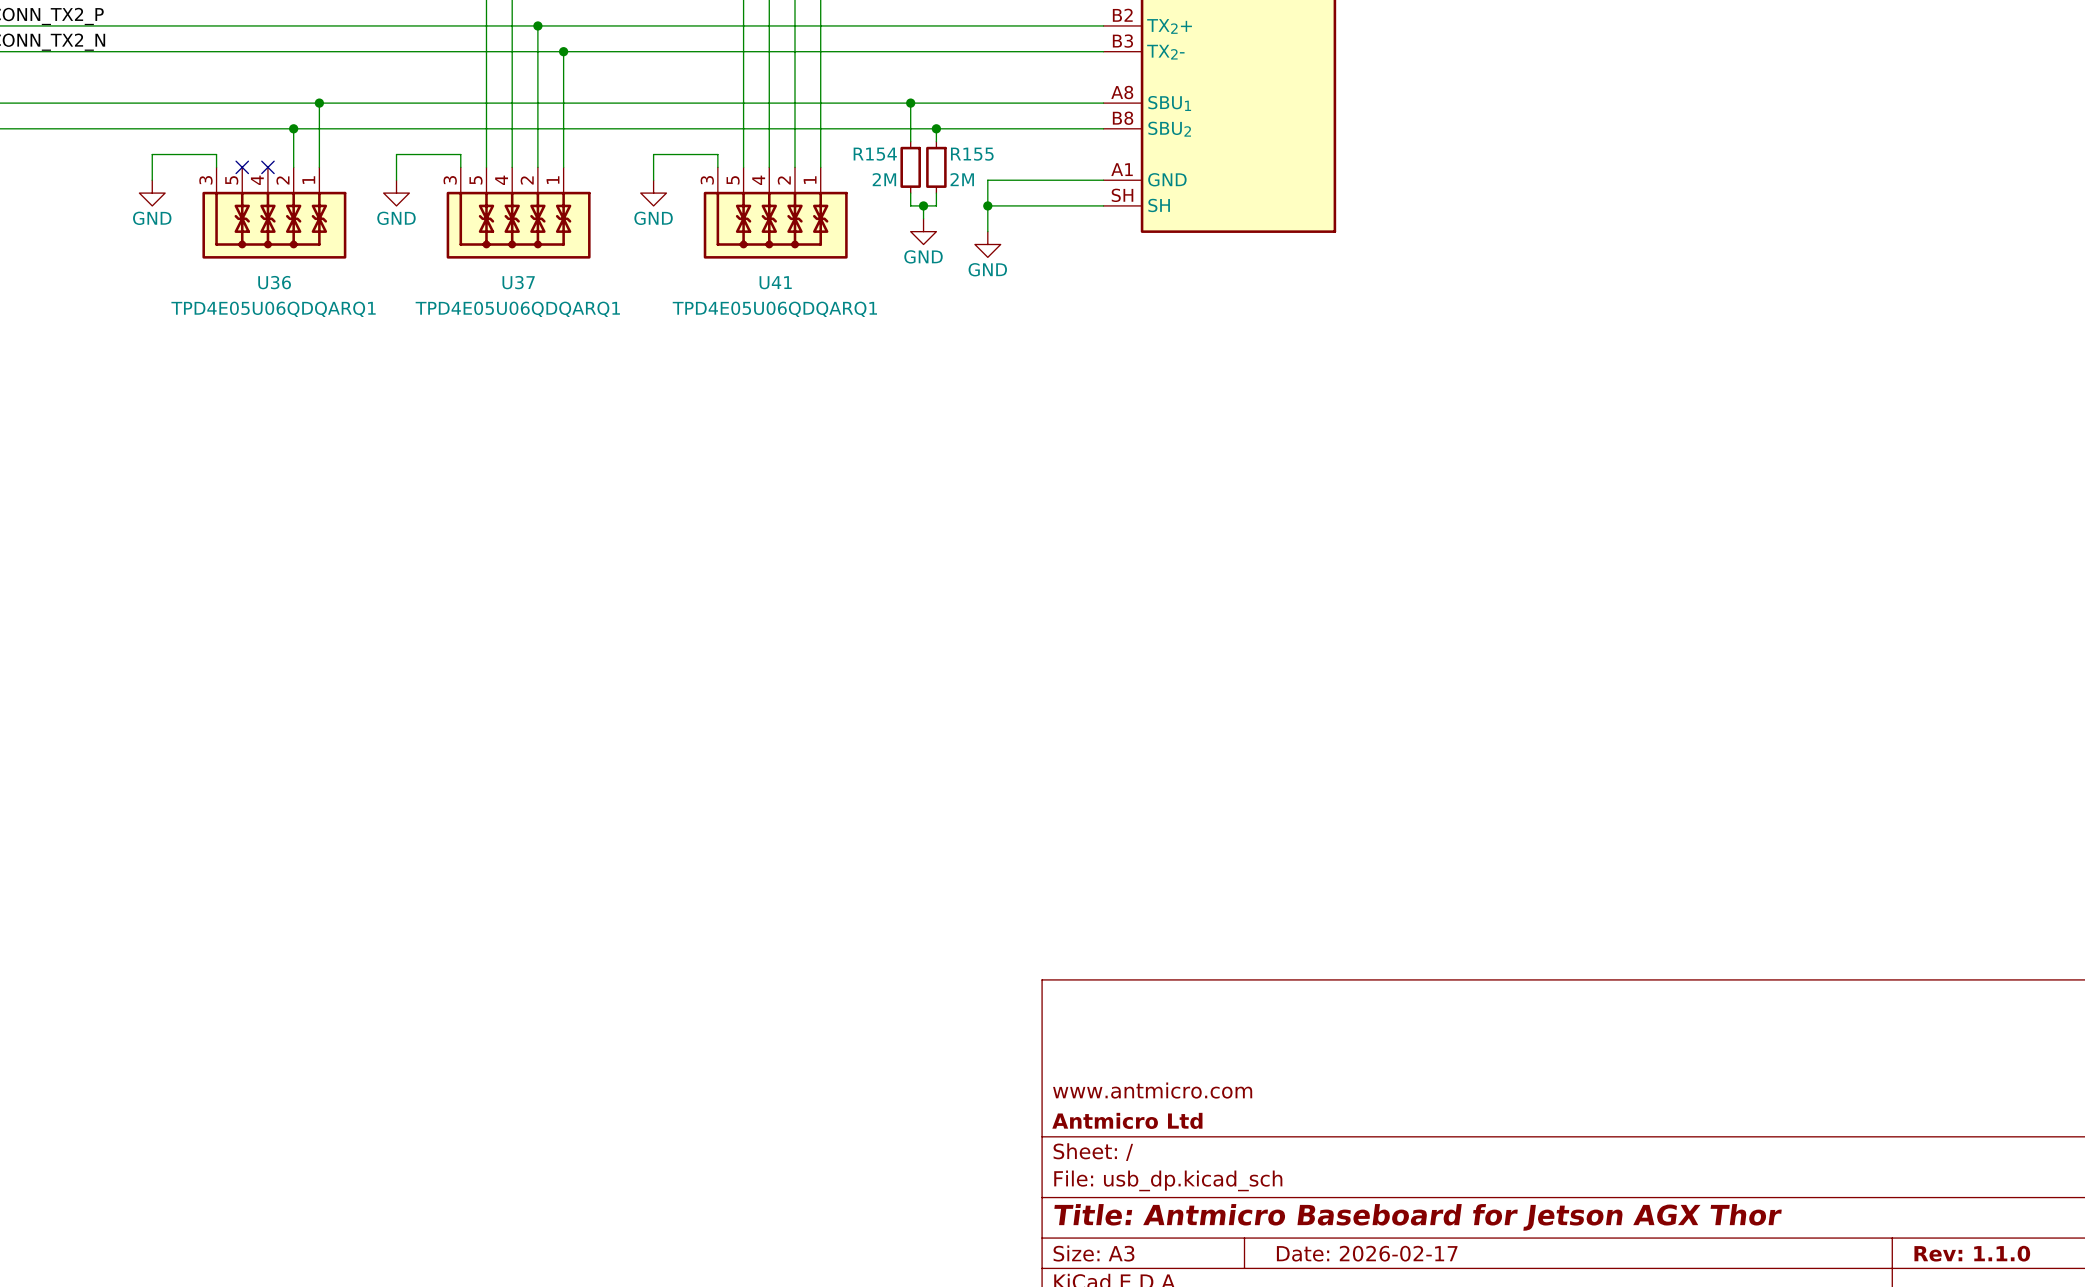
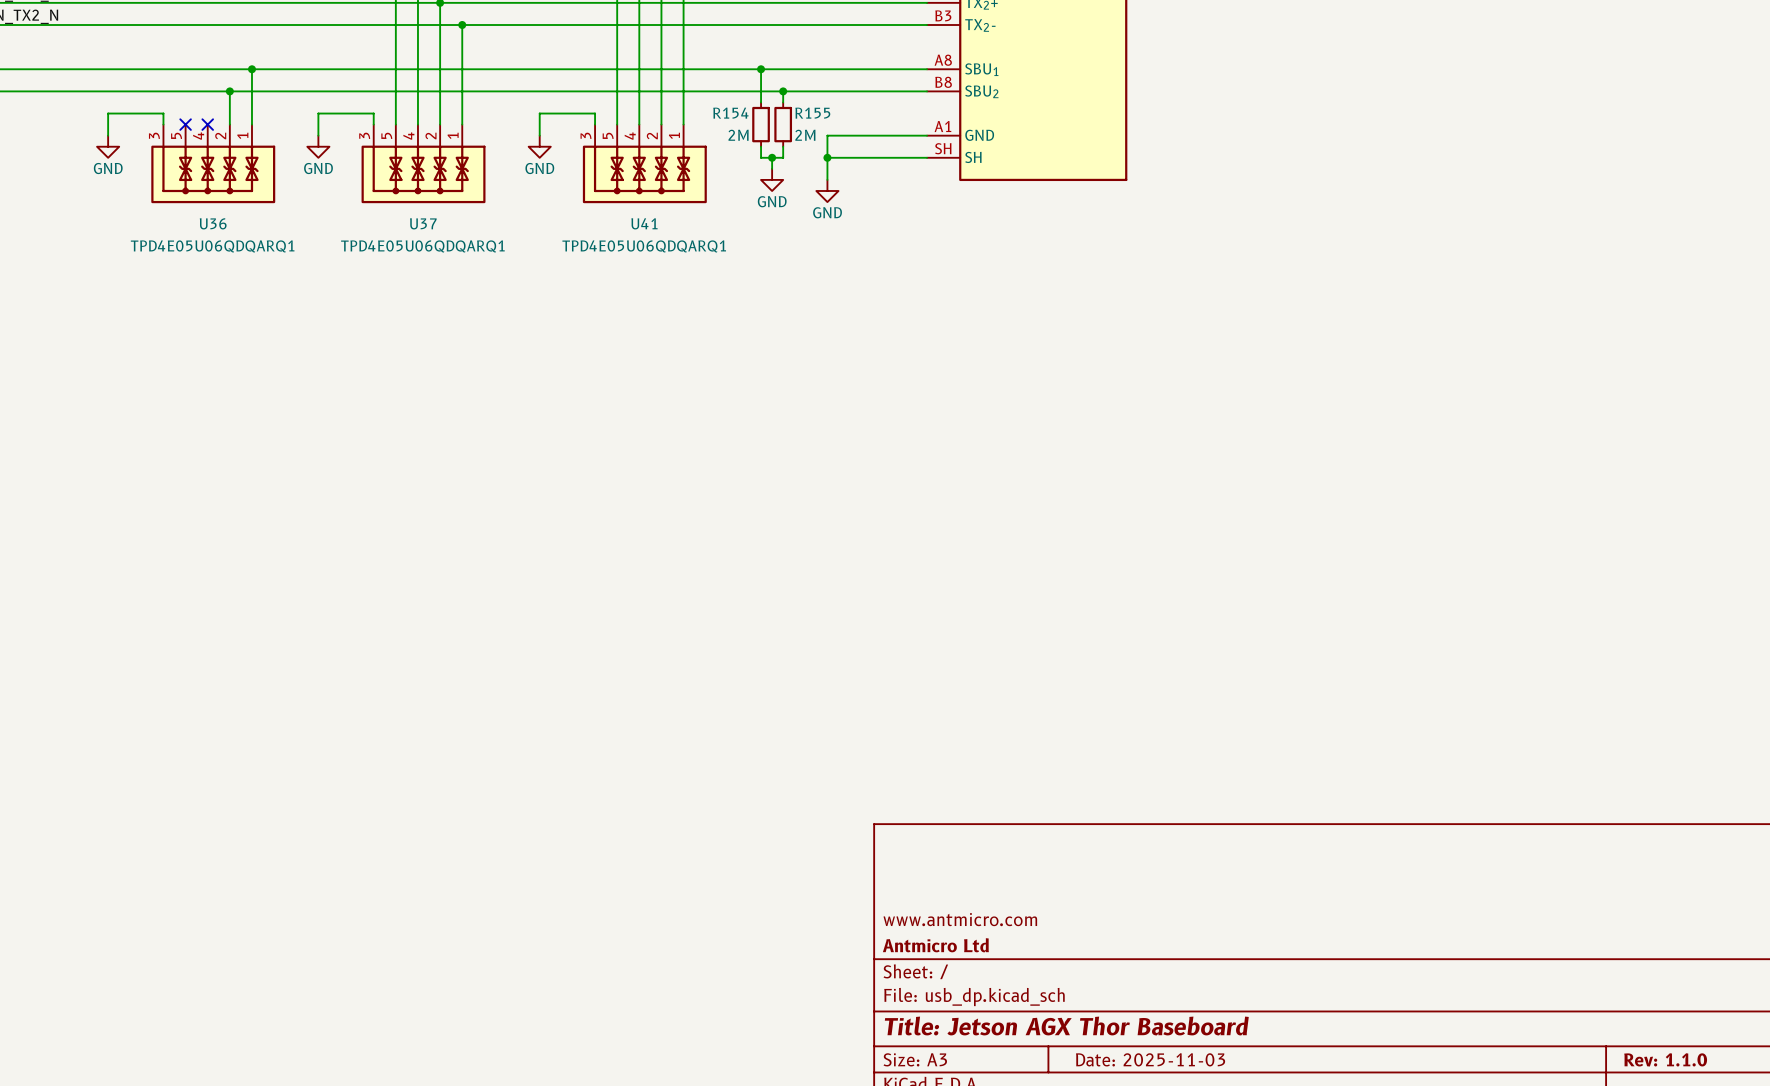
title block: Title: Antmicro Baseboard for Jetson AGX Thor (1418, 1217) -> Title: Jetson AGX Thor Baseboard (1066, 1026)
title block: Date: 2026-02-17 (1367, 1253) -> Date: 2025-11-03 (1150, 1059)

